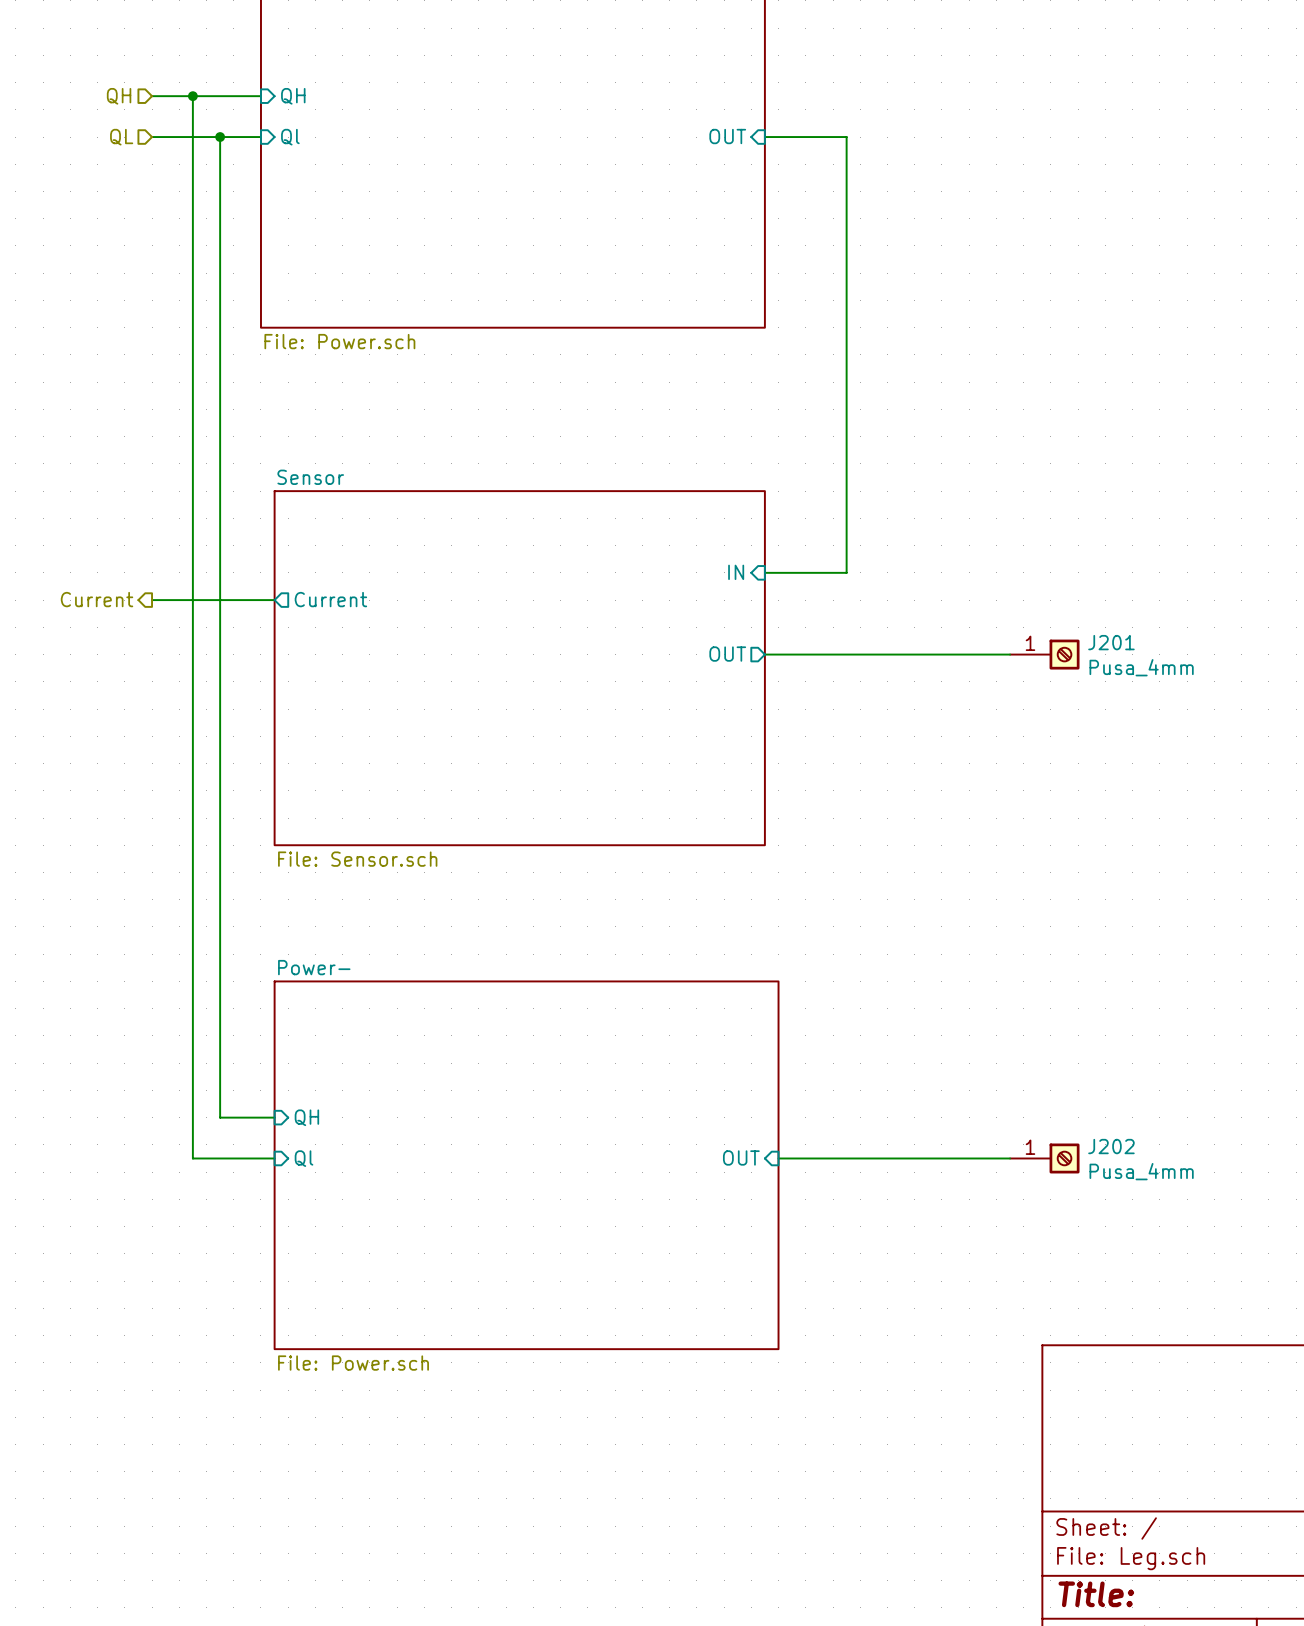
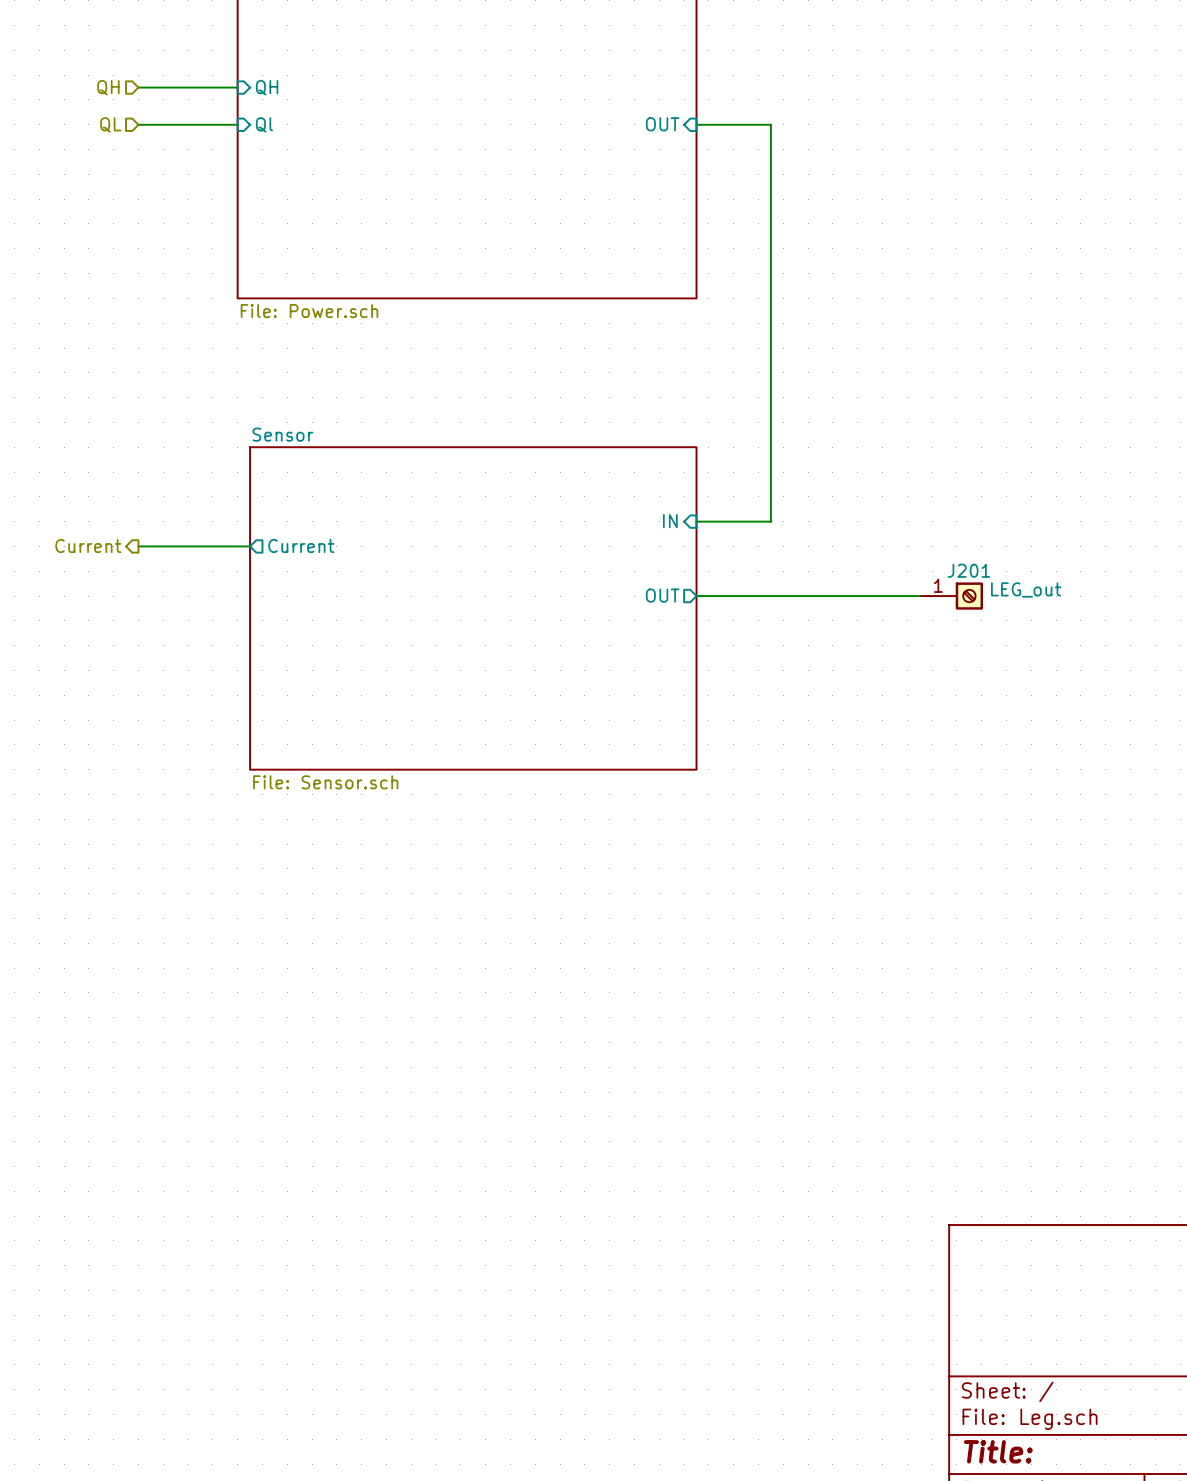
wire: (192, 96) (192, 1158) (274, 1158) -> none
junction: (192, 96) -> none
wire: (220, 137) (220, 1117) (274, 1117) -> none
junction: (220, 137) -> none
J201 name position: J201 (1111, 642) -> J201 (969, 570)
J201 value: Pusa_4mm (1141, 667) -> LEG_out (1026, 589)
sheet pin: QH (306, 1117) -> none
sheet pin: OUT (741, 1157) -> none
sheet pin: Ql (304, 1158) -> none
wire: (778, 1158) (1010, 1158) -> none
J202: Pusa_4mm (1044, 1158) -> none
sheet Power-: File: Power.sch (526, 1165) -> none

